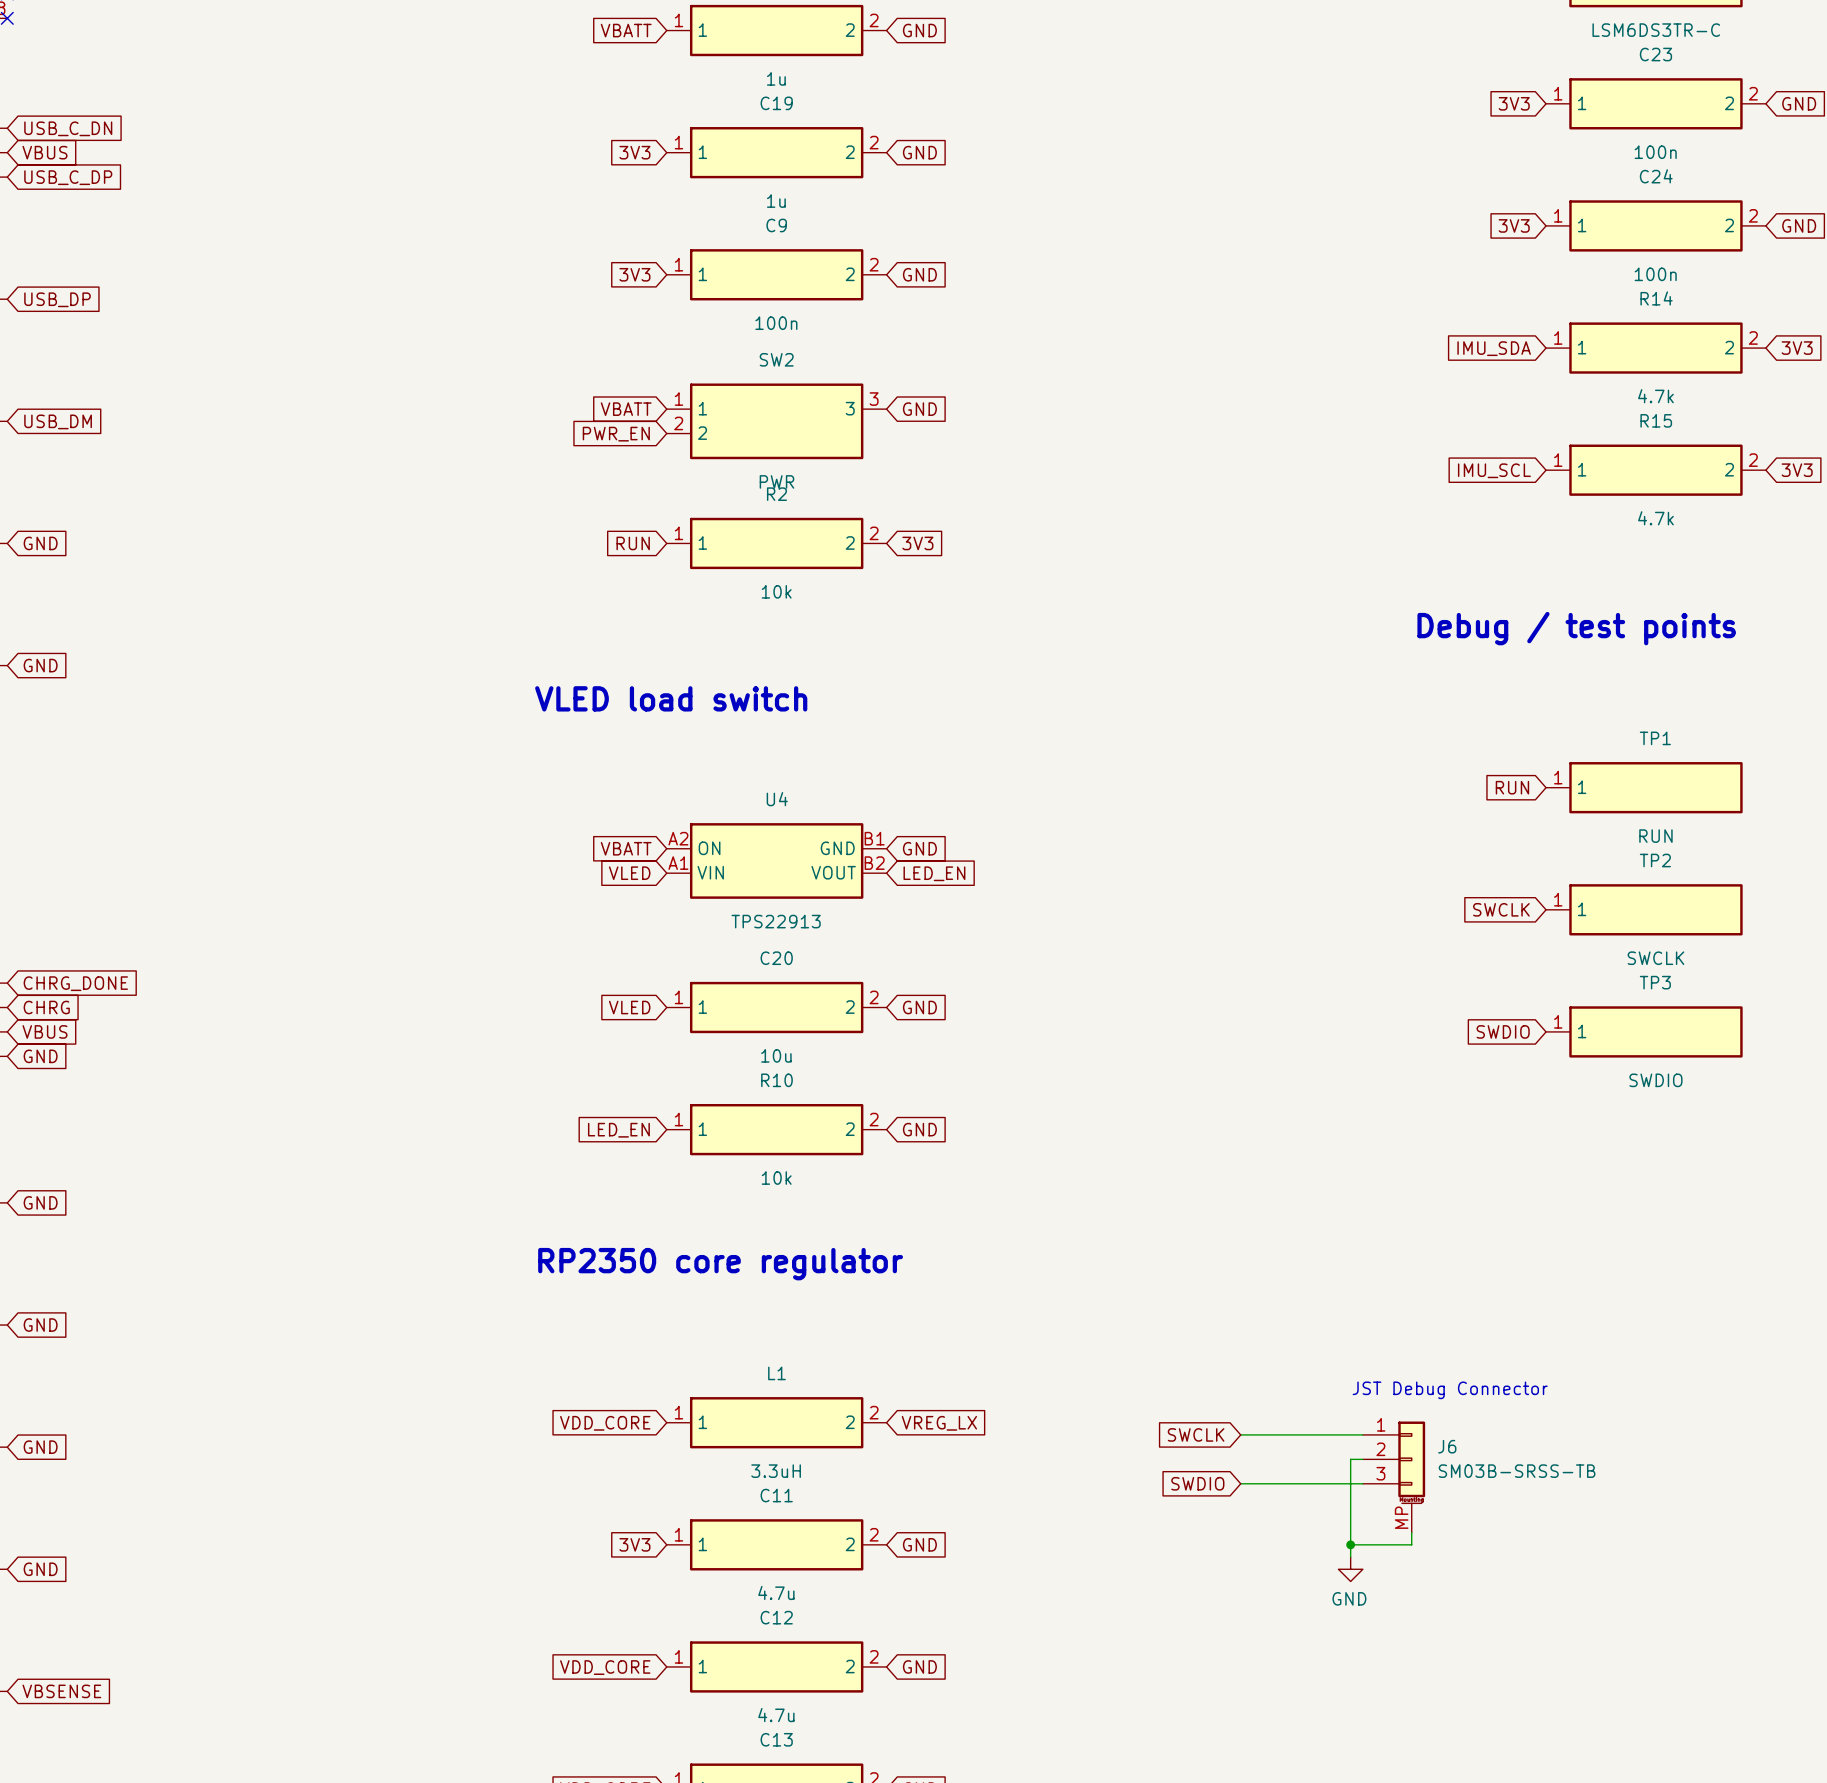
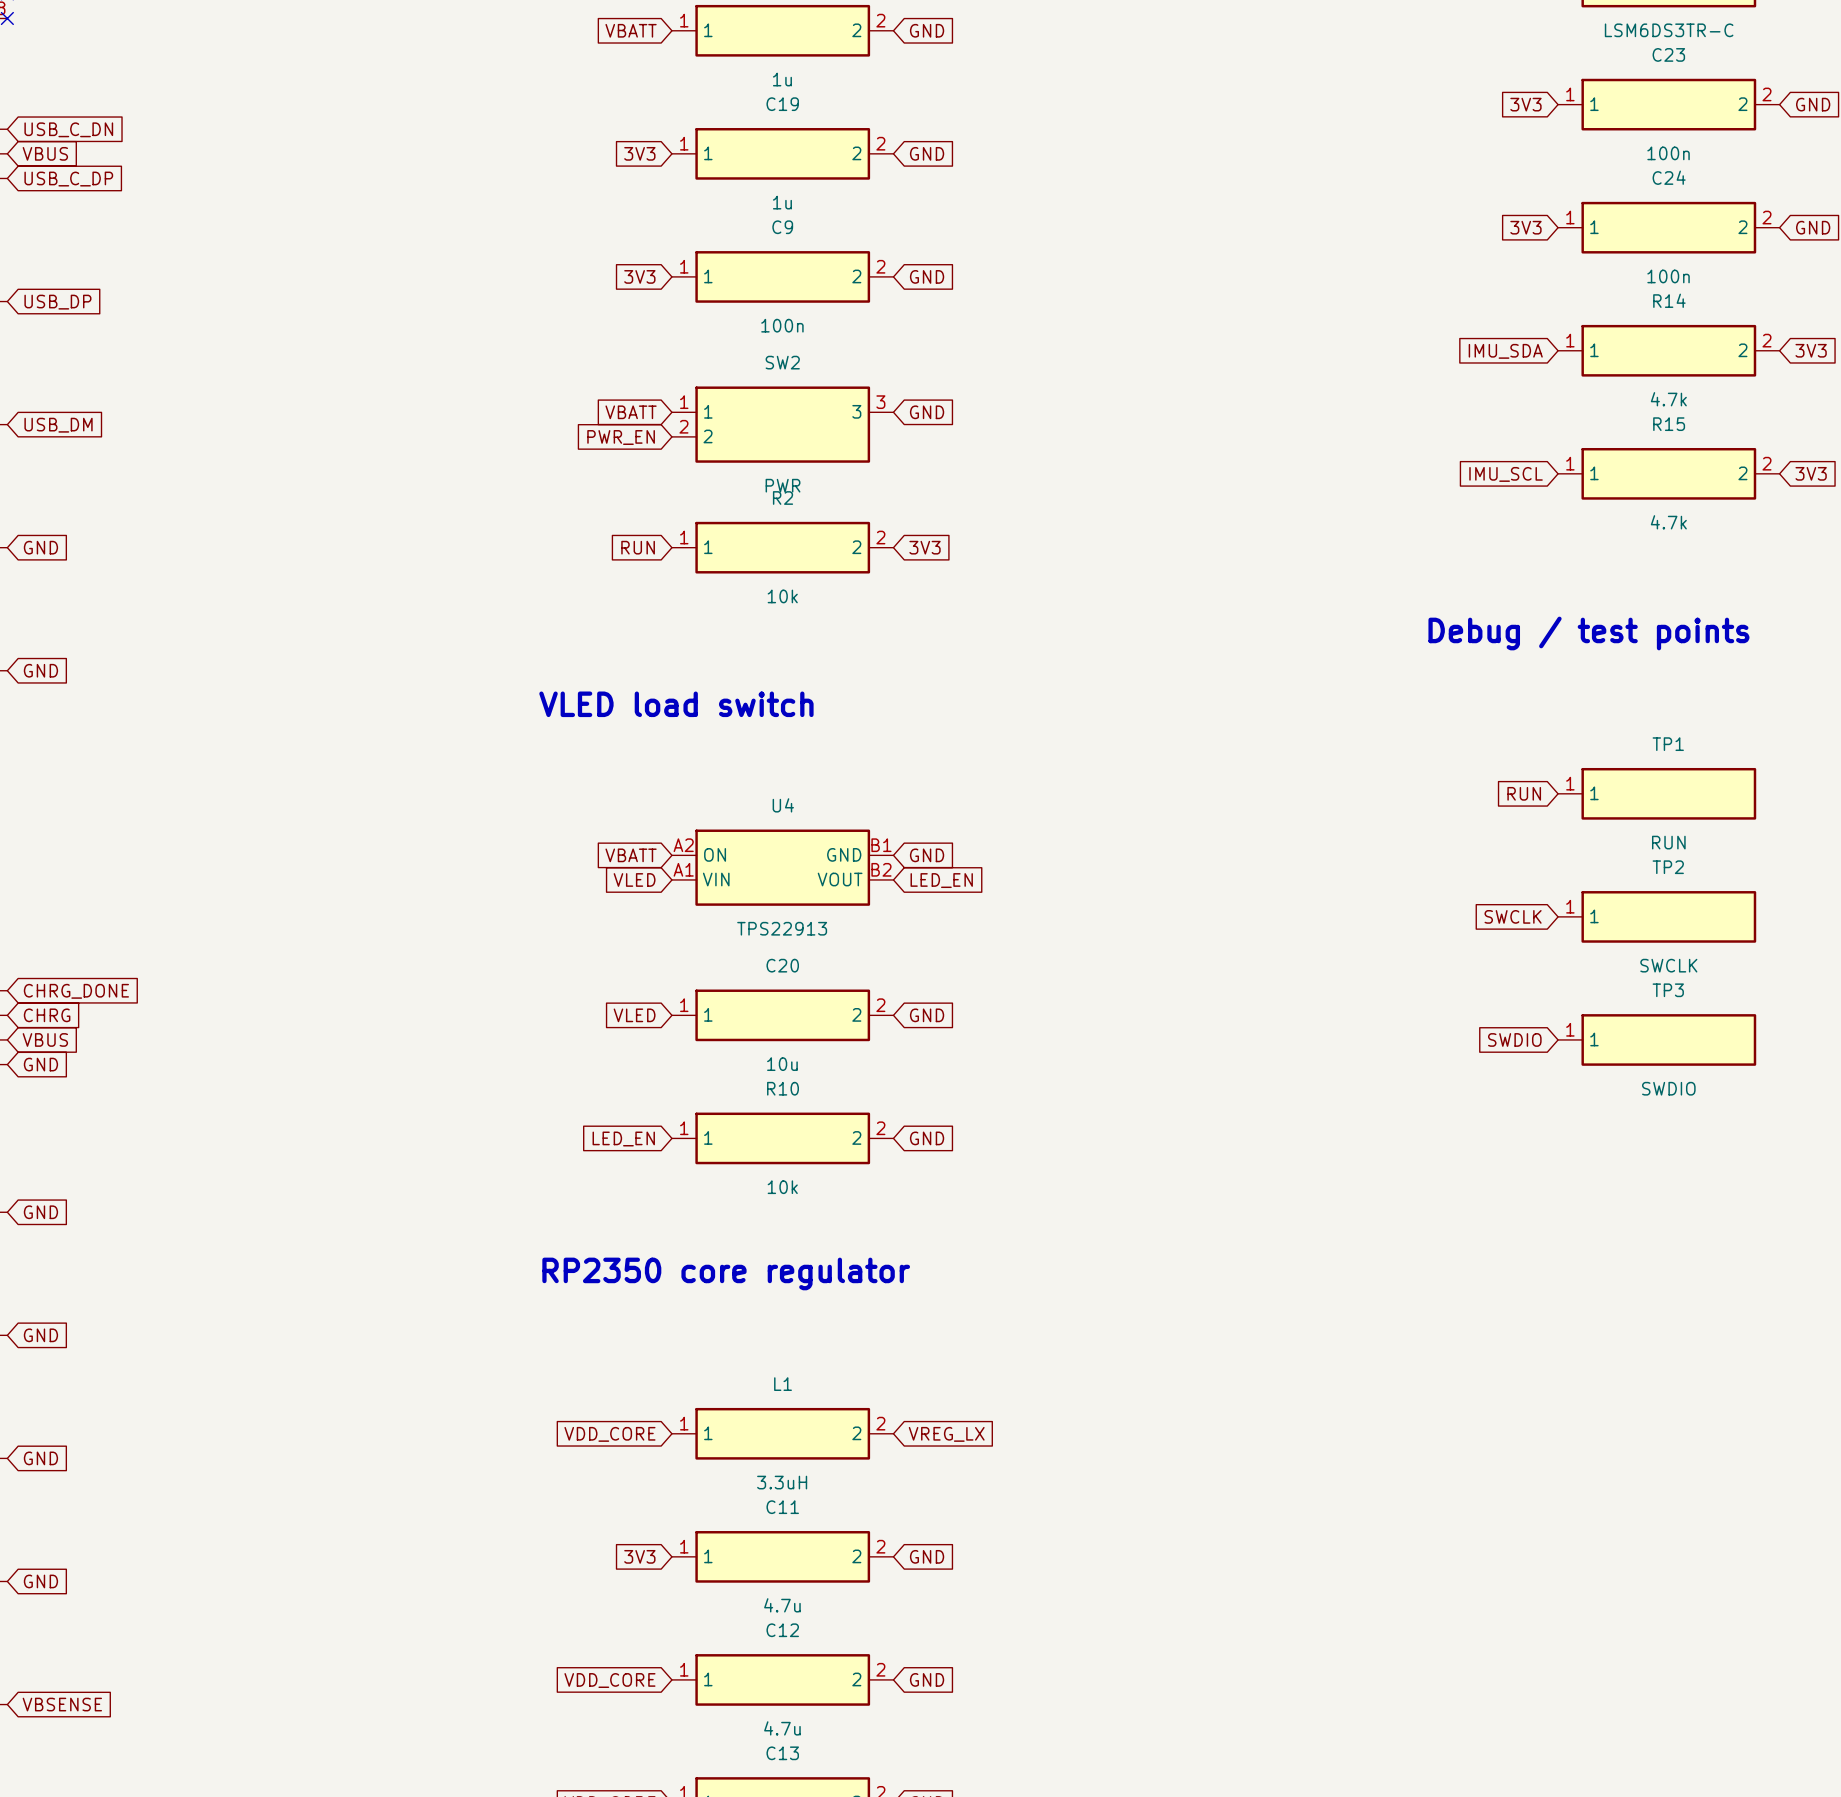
text: JST Debug Connector (1450, 1390) -> none
global label: SWCLK (1196, 1434) -> none
wire: (1240, 1434) (1362, 1434) -> none
wire: (1362, 1459) (1350, 1459) (1350, 1557) -> none
J6: SM03B-SRSS-TB (1394, 1477) -> none
global label: SWDIO (1197, 1483) -> none
wire: (1240, 1483) (1362, 1483) -> none
wire: (1411, 1532) (1411, 1544) (1350, 1544) -> none
junction: (1350, 1544) -> none
power symbol: GND (1350, 1569) -> none

